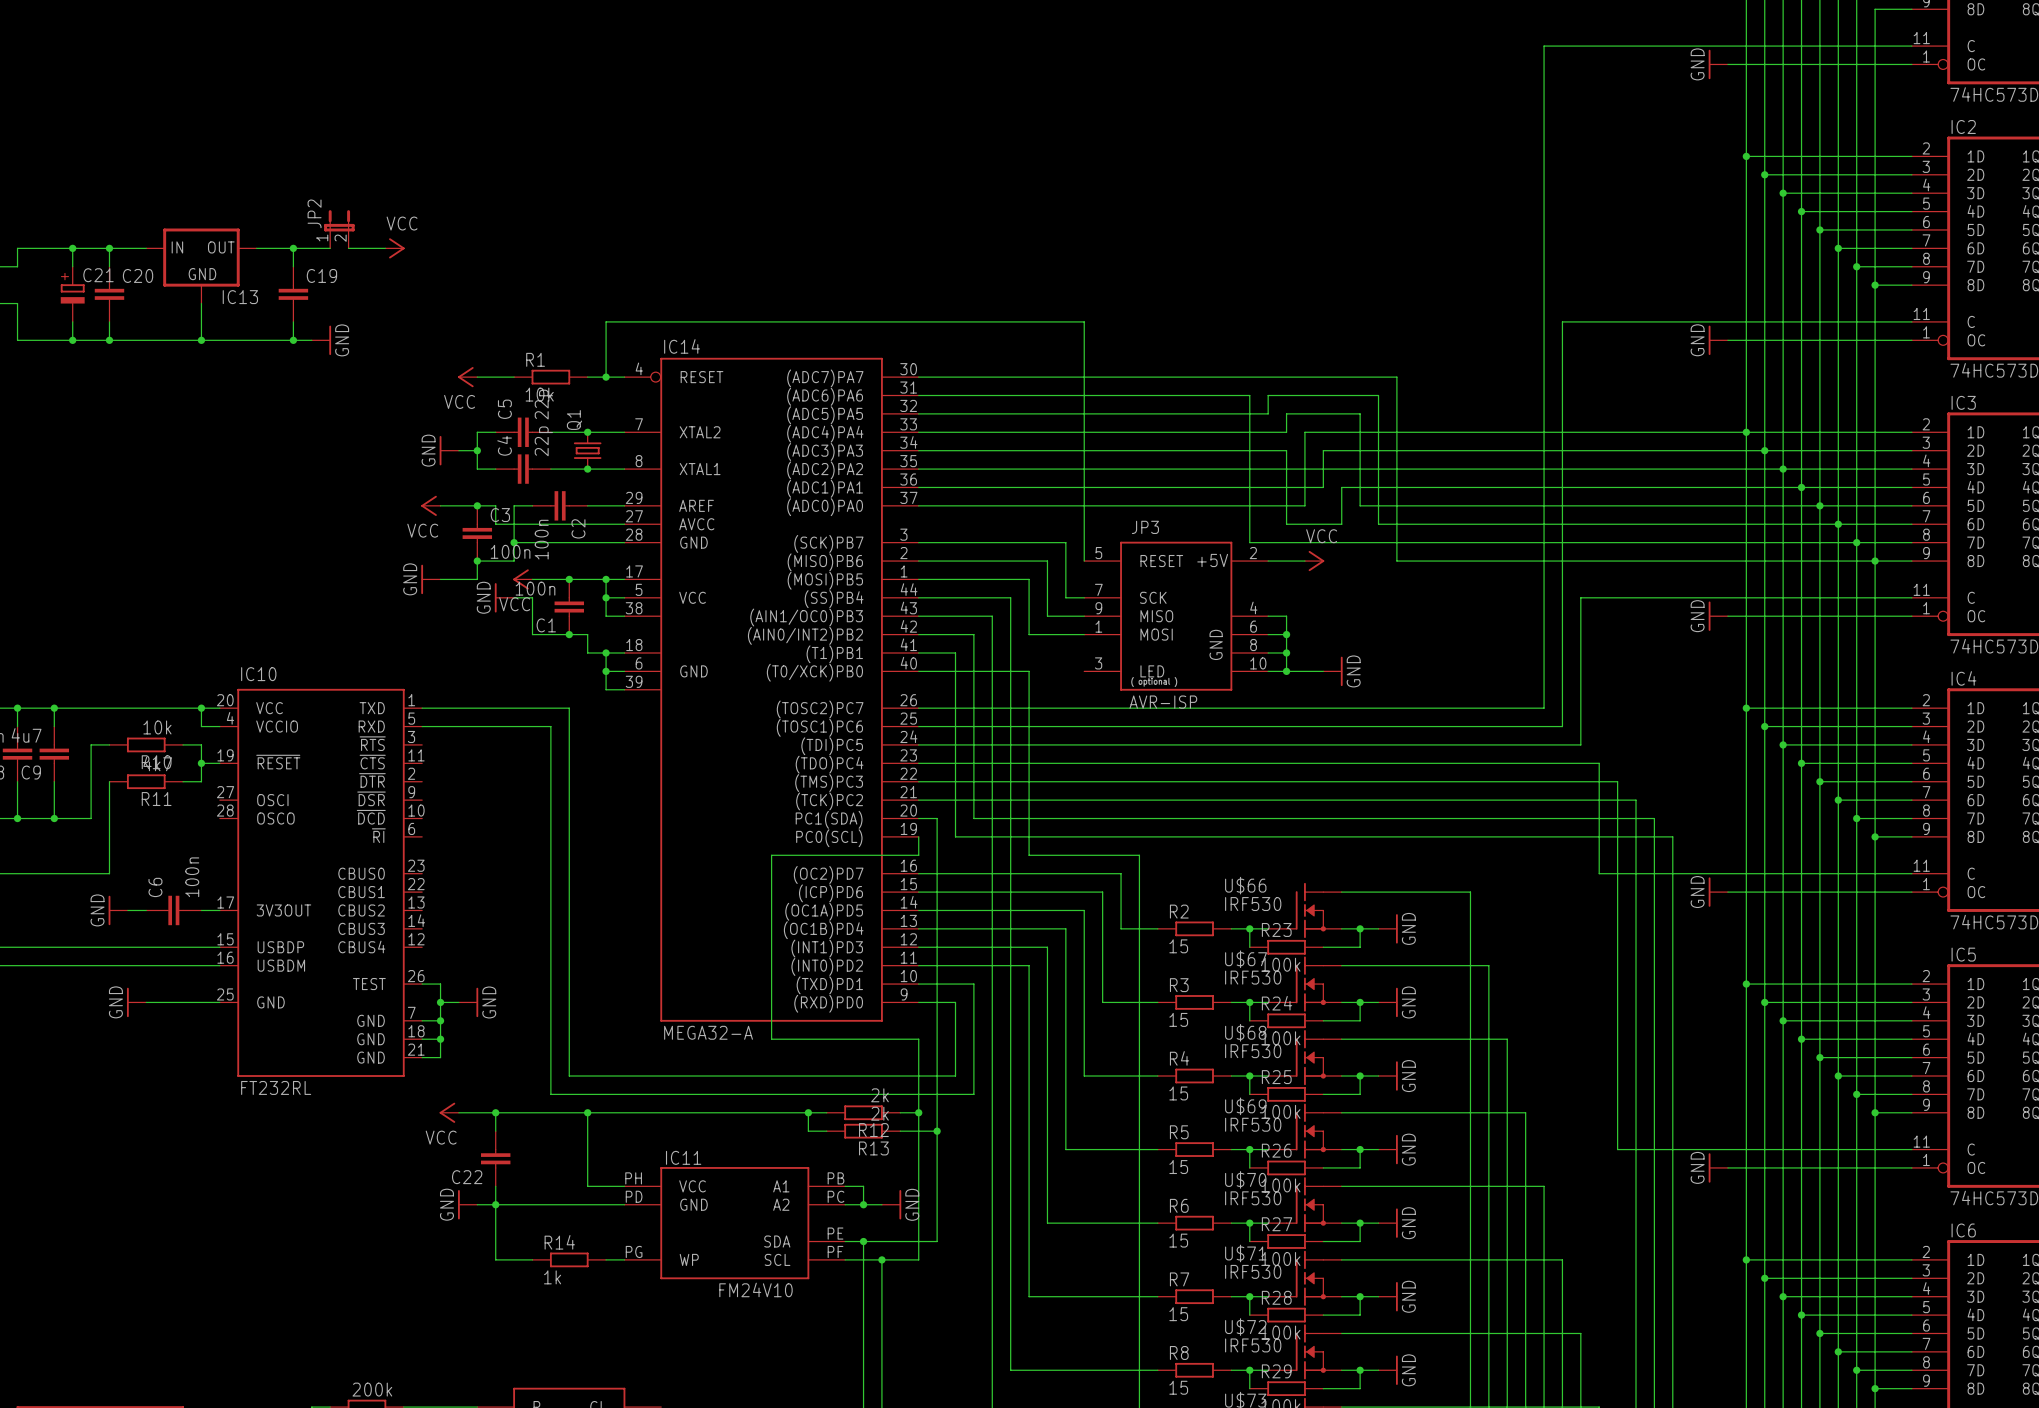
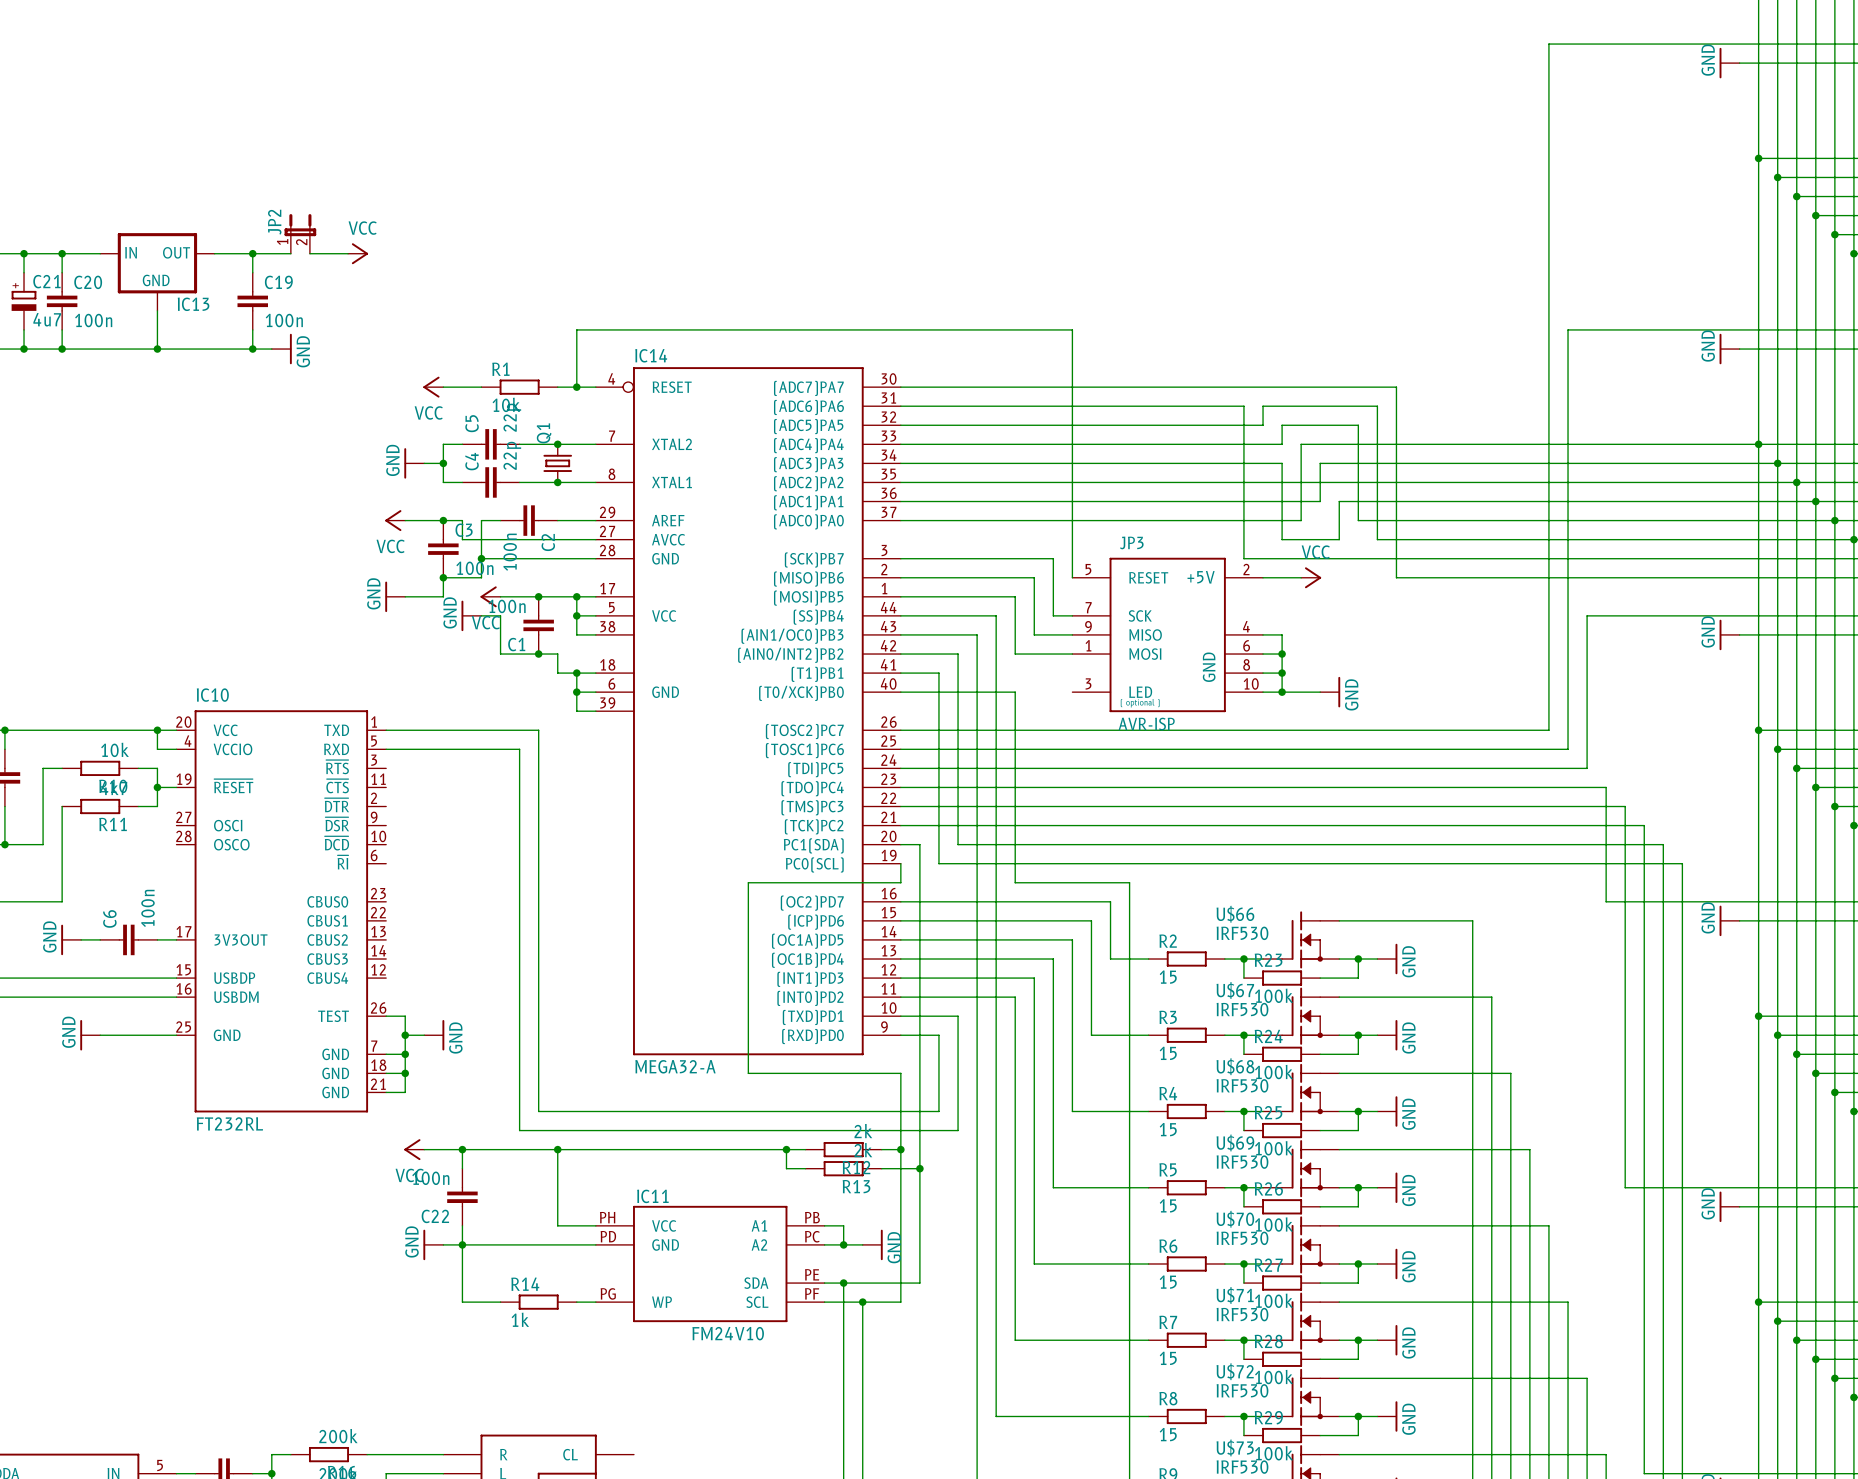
C21 value: none -> 4u7 (47, 319)
C20 value: none -> 100n (93, 320)
C19 value: none -> 100n (284, 320)
C22 value: none -> 100n (430, 1178)

